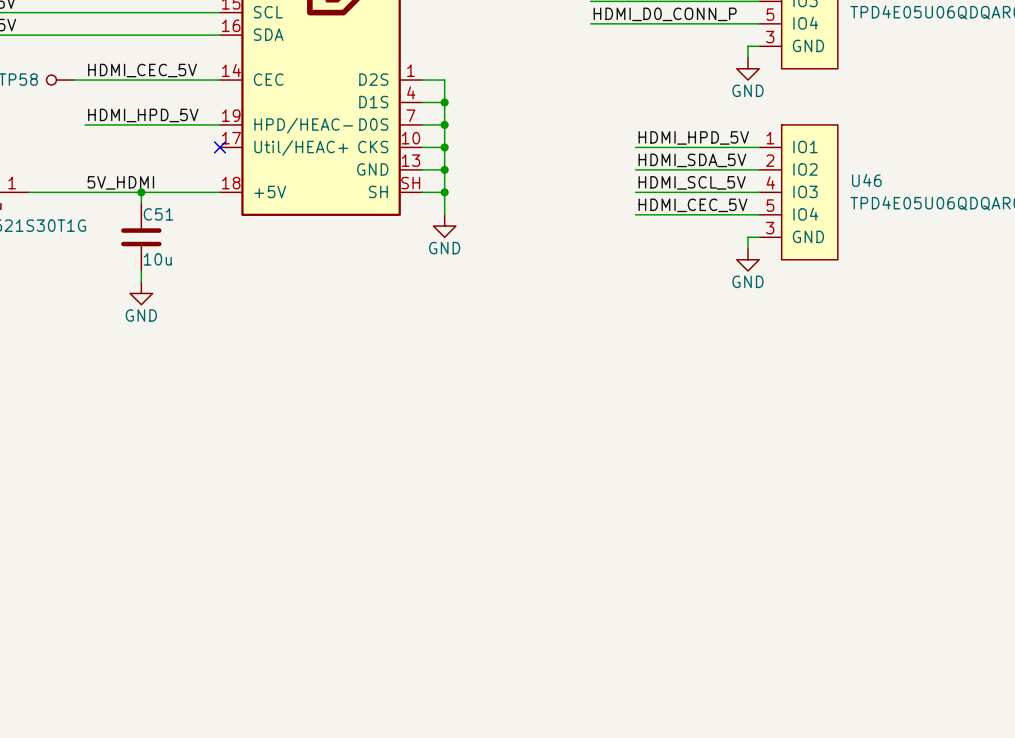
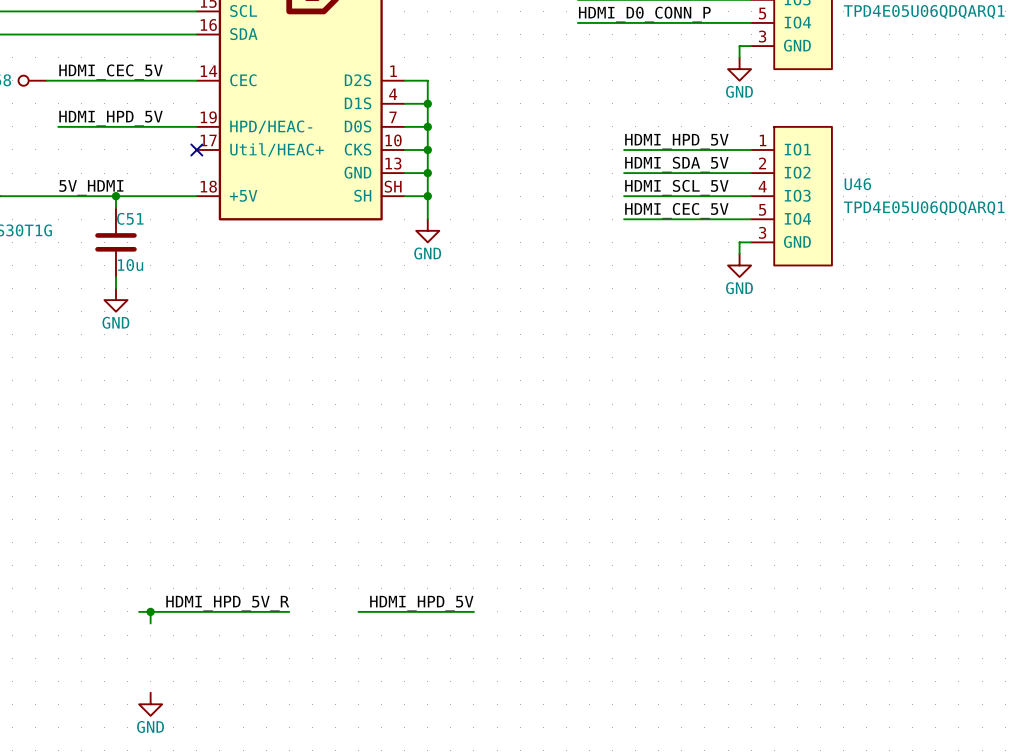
label: none -> HDMI_HPD_5V_R (227, 603)
label: none -> HDMI_HPD_5V (421, 603)
wire: none -> (139, 611) (289, 611)
wire: none -> (150, 611) (150, 623)
junction: none -> (150, 611)
wire: none -> (358, 611) (473, 611)
power symbol: none -> GND (150, 704)

